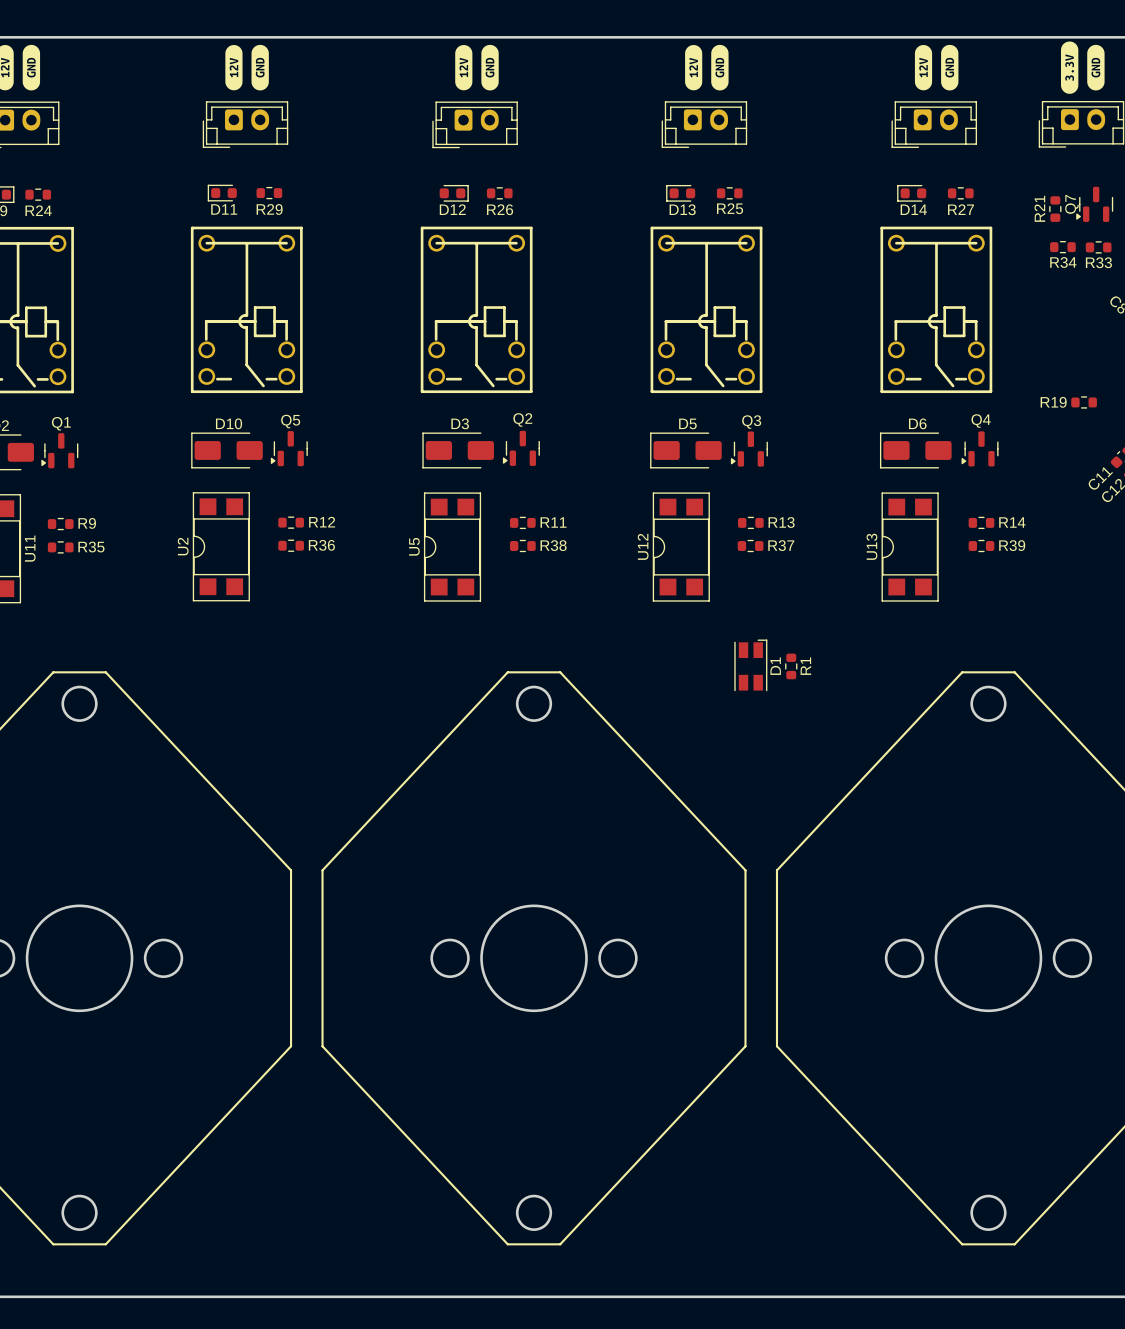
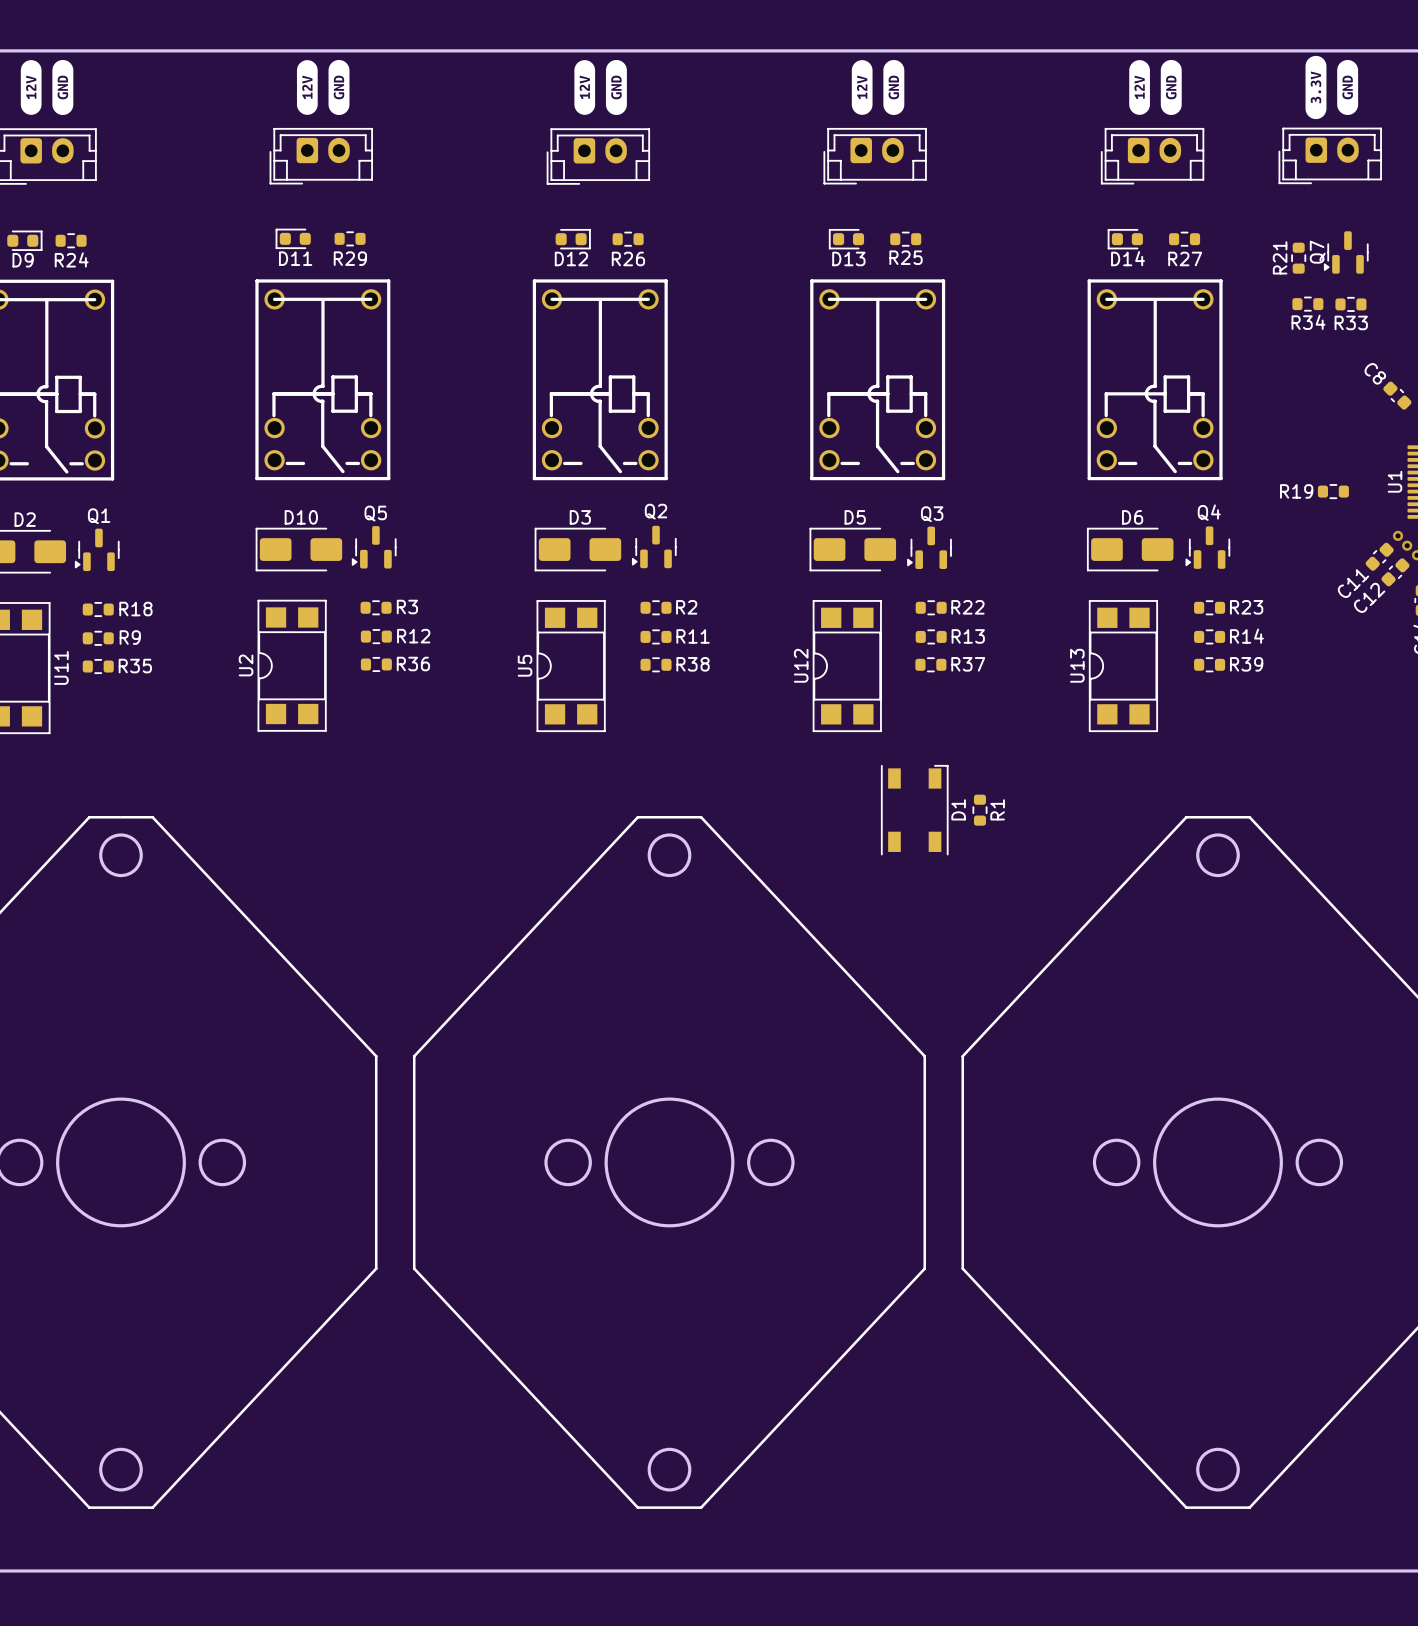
R3: none -> (376, 607)
R2: none -> (656, 607)
R22: none -> (931, 607)
R23: none -> (1209, 607)
R18: none -> (98, 609)
D1 footprint: [734, 639, 768, 692] -> [881, 765, 949, 856]

